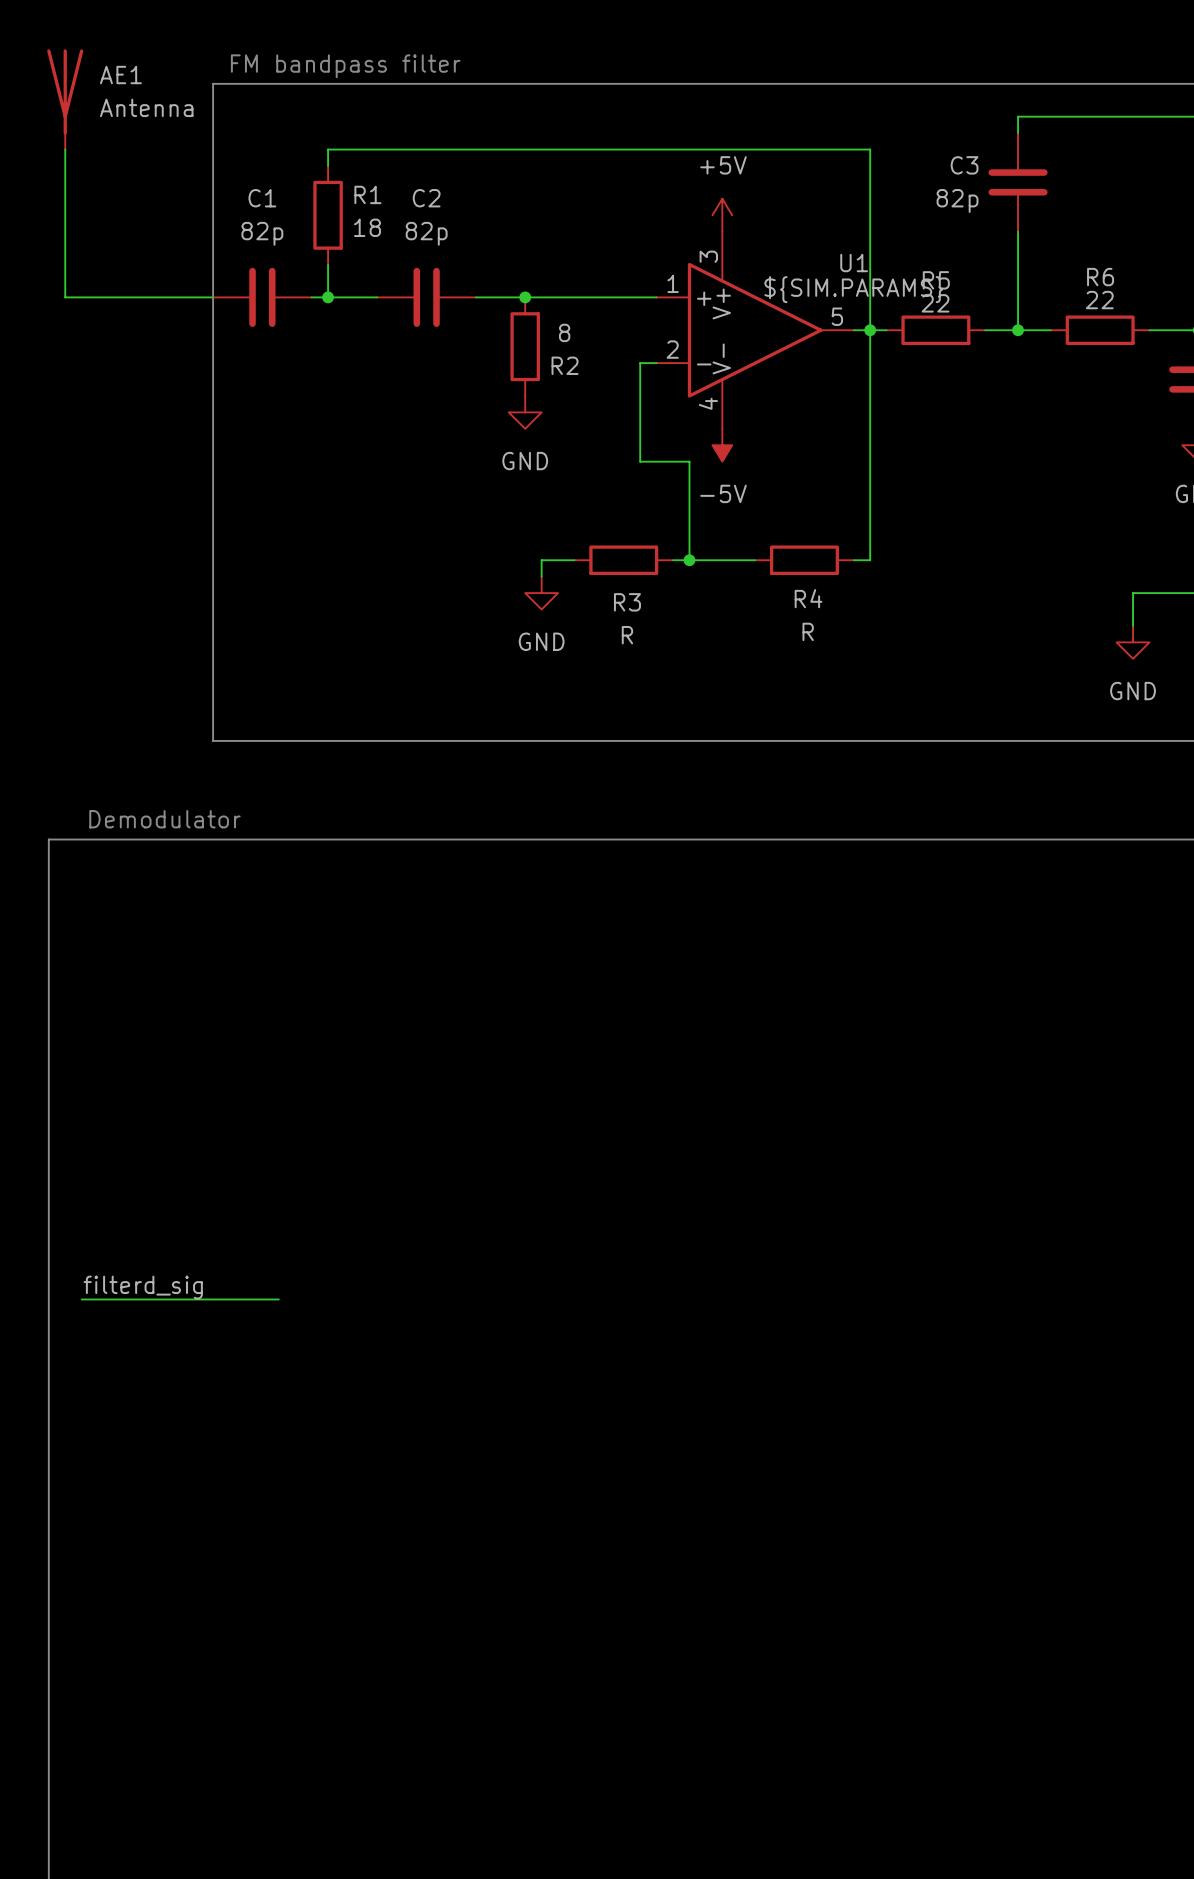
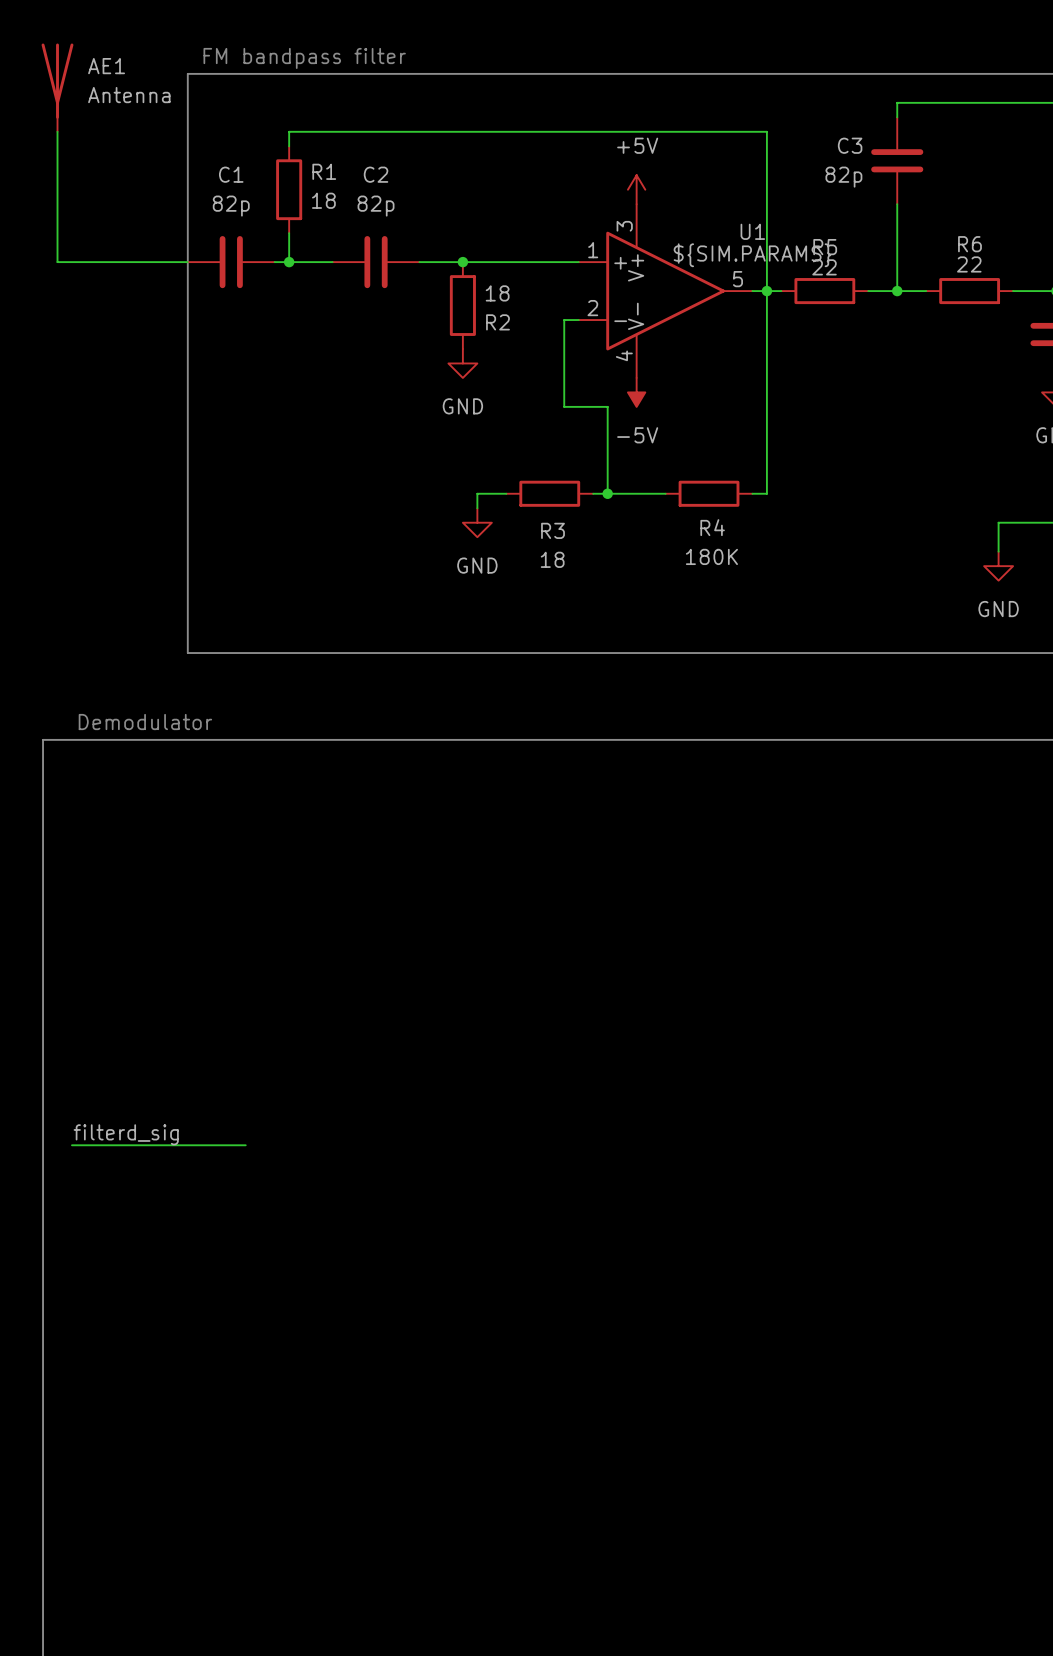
R2 value: 8 (564, 332) -> 18 (497, 293)
R4 value: R (808, 631) -> 180K (711, 556)
R3 value: R (627, 635) -> 18 (552, 559)

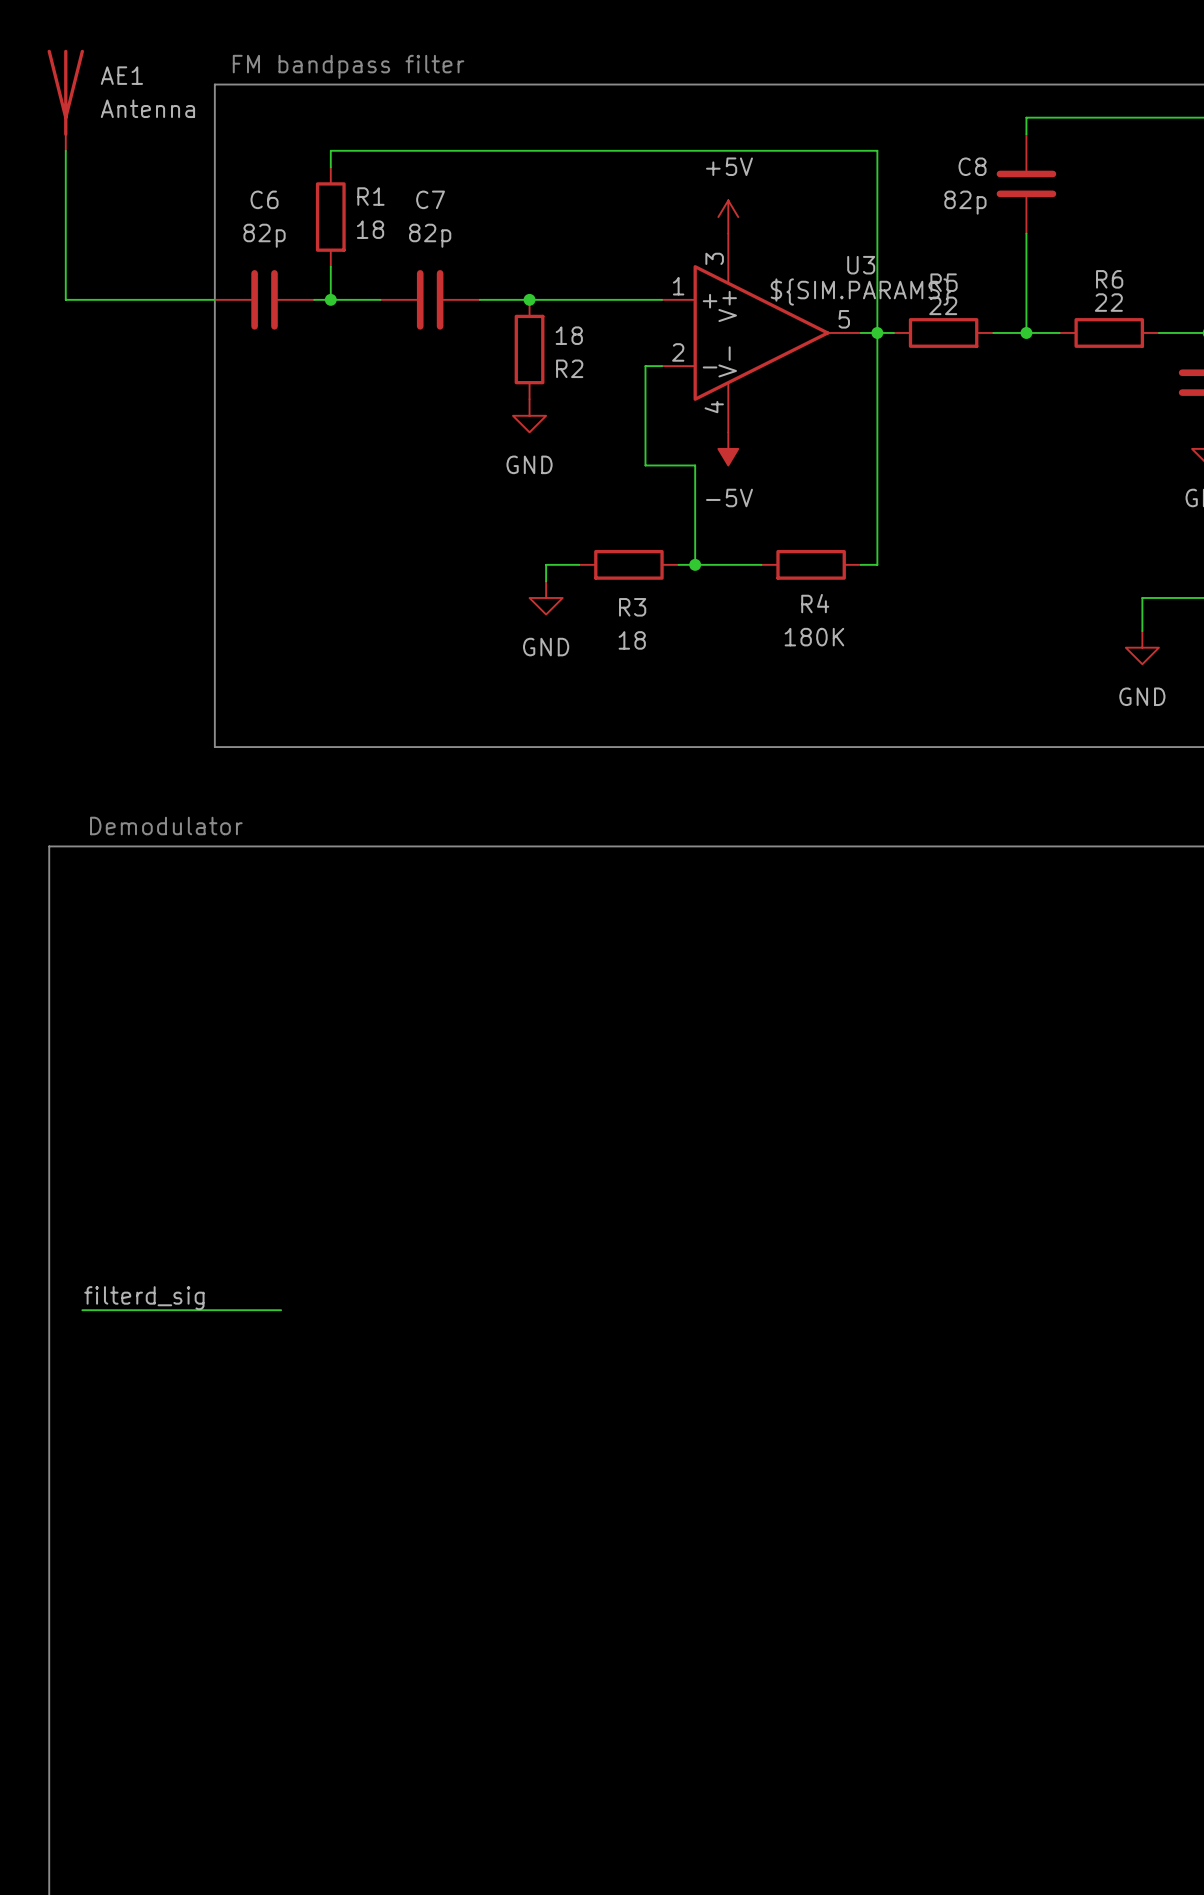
C3 name: C3 (850, 145) -> C8 (972, 166)
C1 name: C1 (231, 174) -> C6 (264, 199)
C2 name: C2 (376, 174) -> C7 (430, 199)
U1 name: U1 (752, 231) -> U3 (861, 265)

